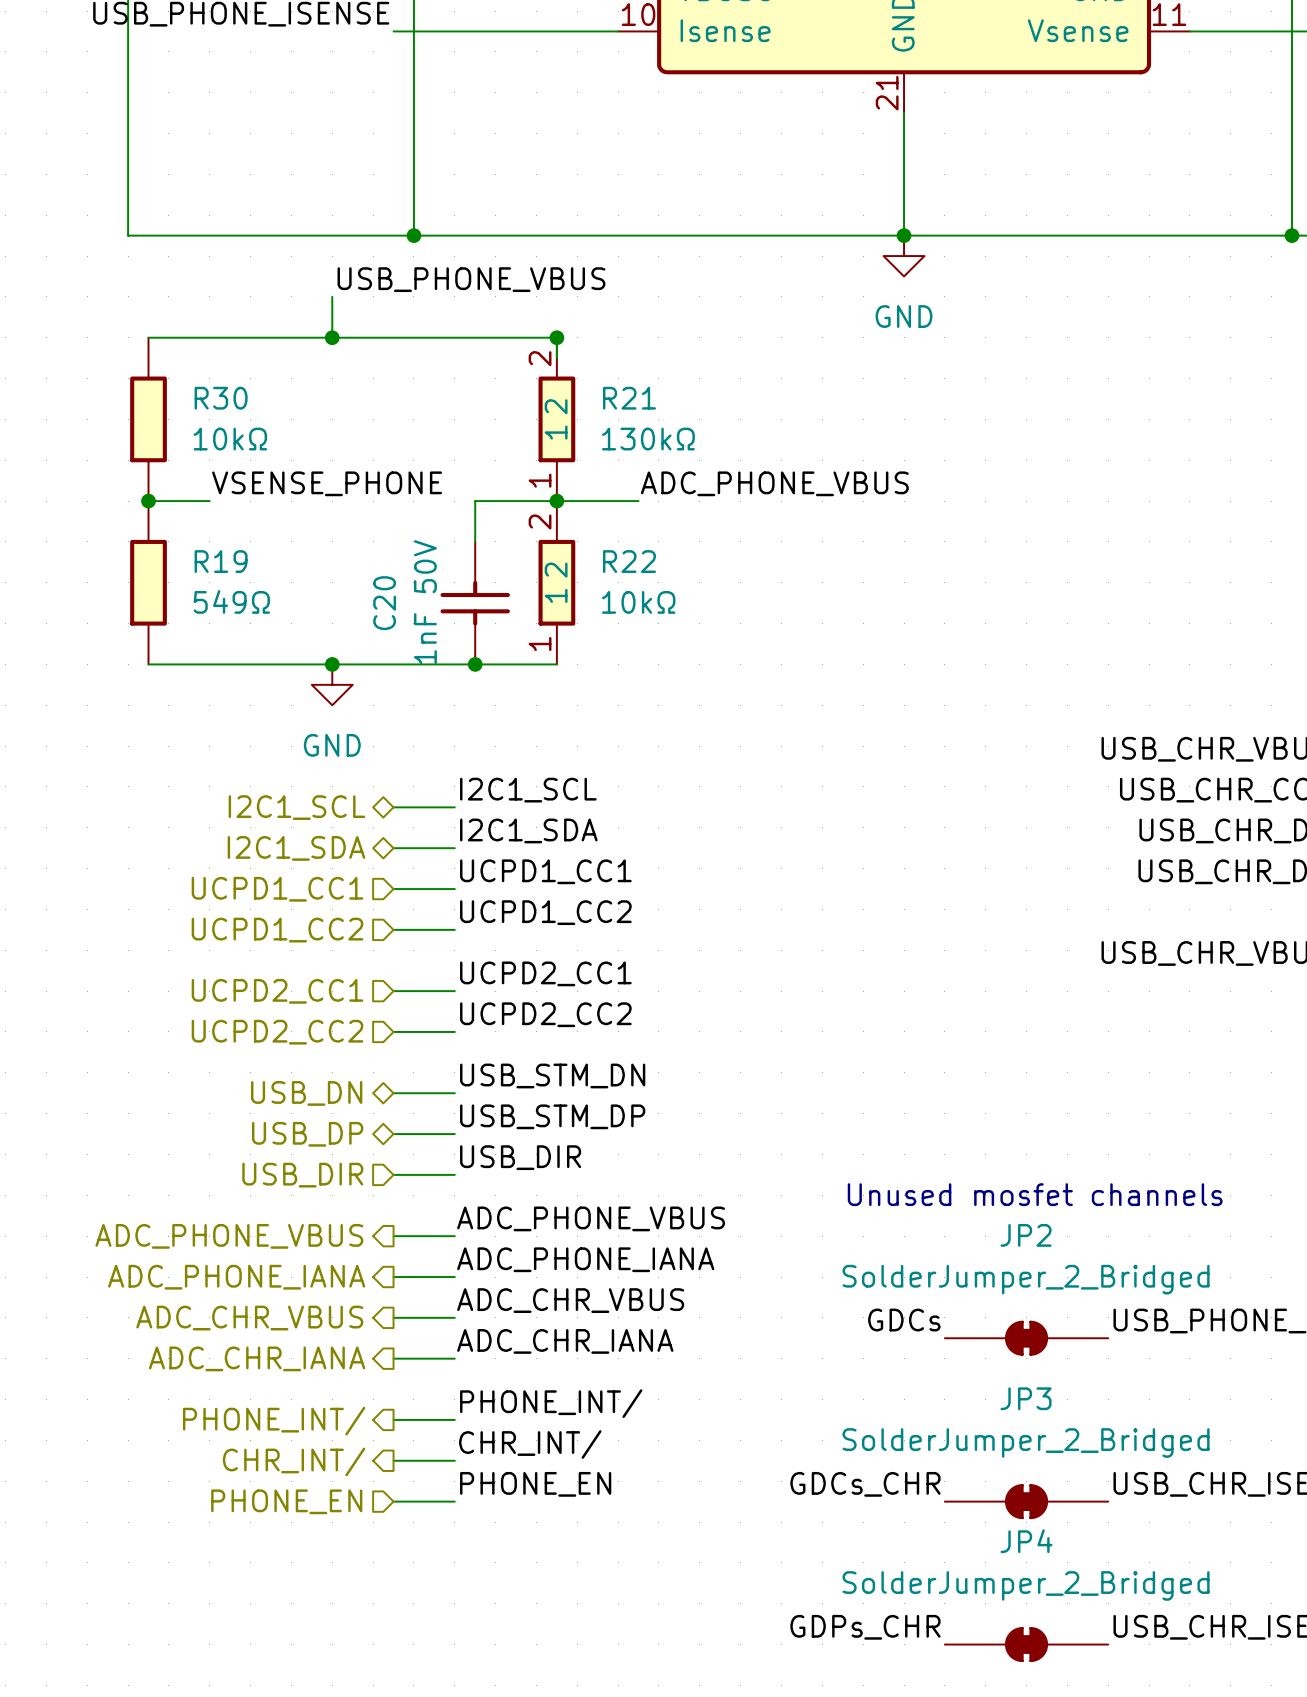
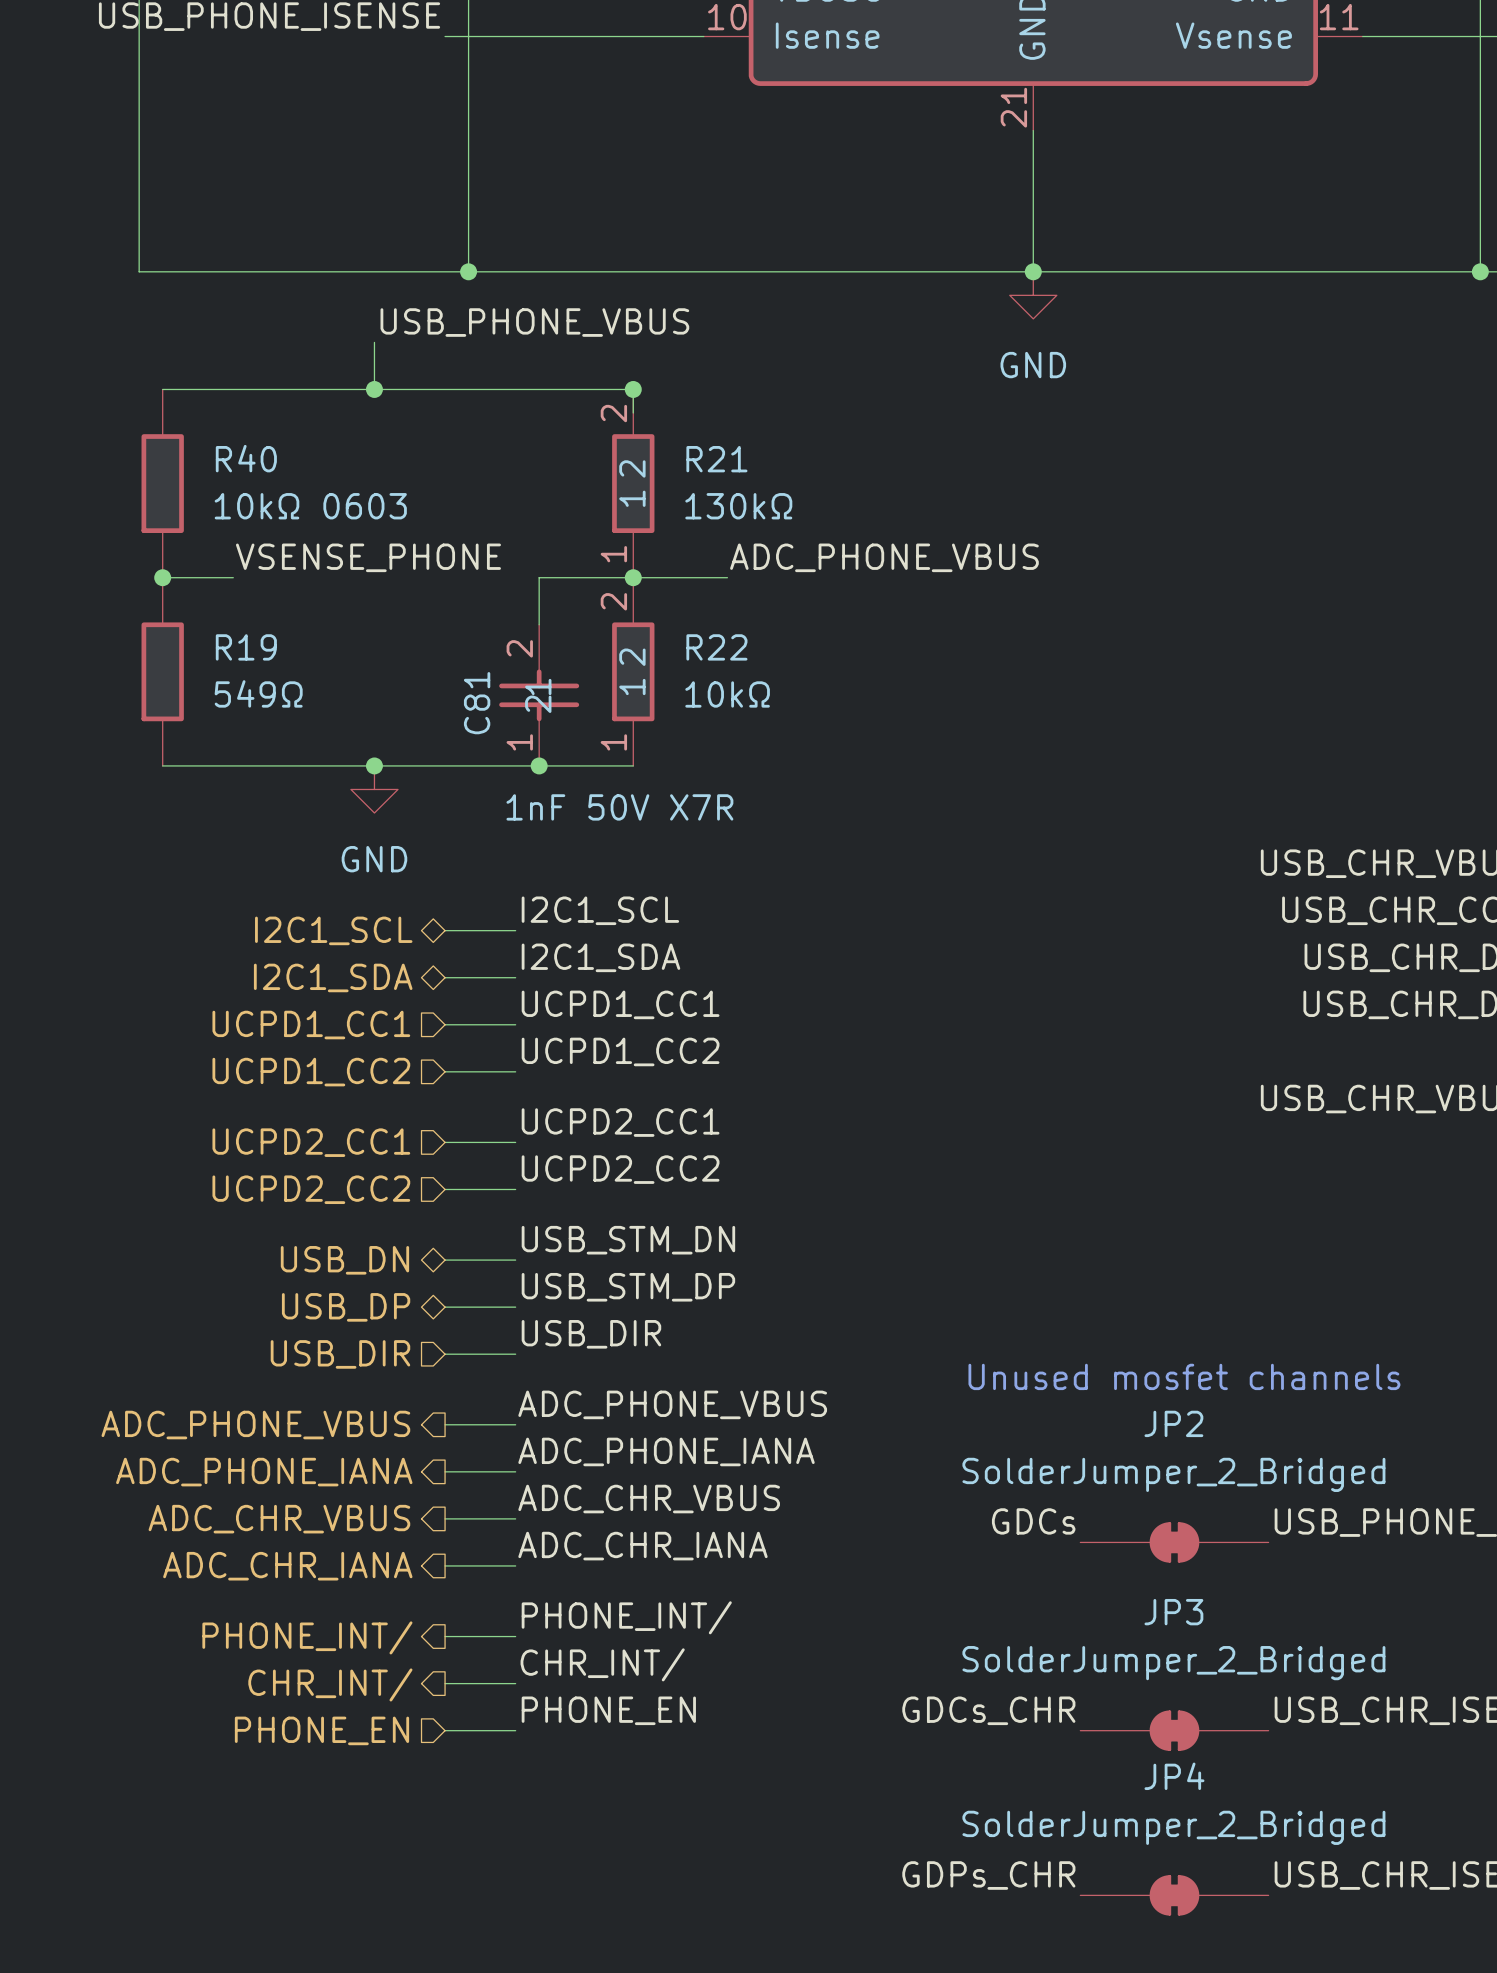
R30 name: R30 (221, 398) -> R40 (246, 458)
R30 value: 10kΩ (230, 439) -> 10kΩ 0603 (310, 506)
C20 pin number: none -> 2 (519, 648)
C20 pin name: none -> 1 (538, 687)
C20 value: 1nF 50V (425, 602) -> 1nF 50V X7R (619, 807)
C20 name: C20 (384, 603) -> C81 (477, 703)
C20 pin name: none -> 2 (538, 704)
C20 pin number: none -> 1 (519, 742)

